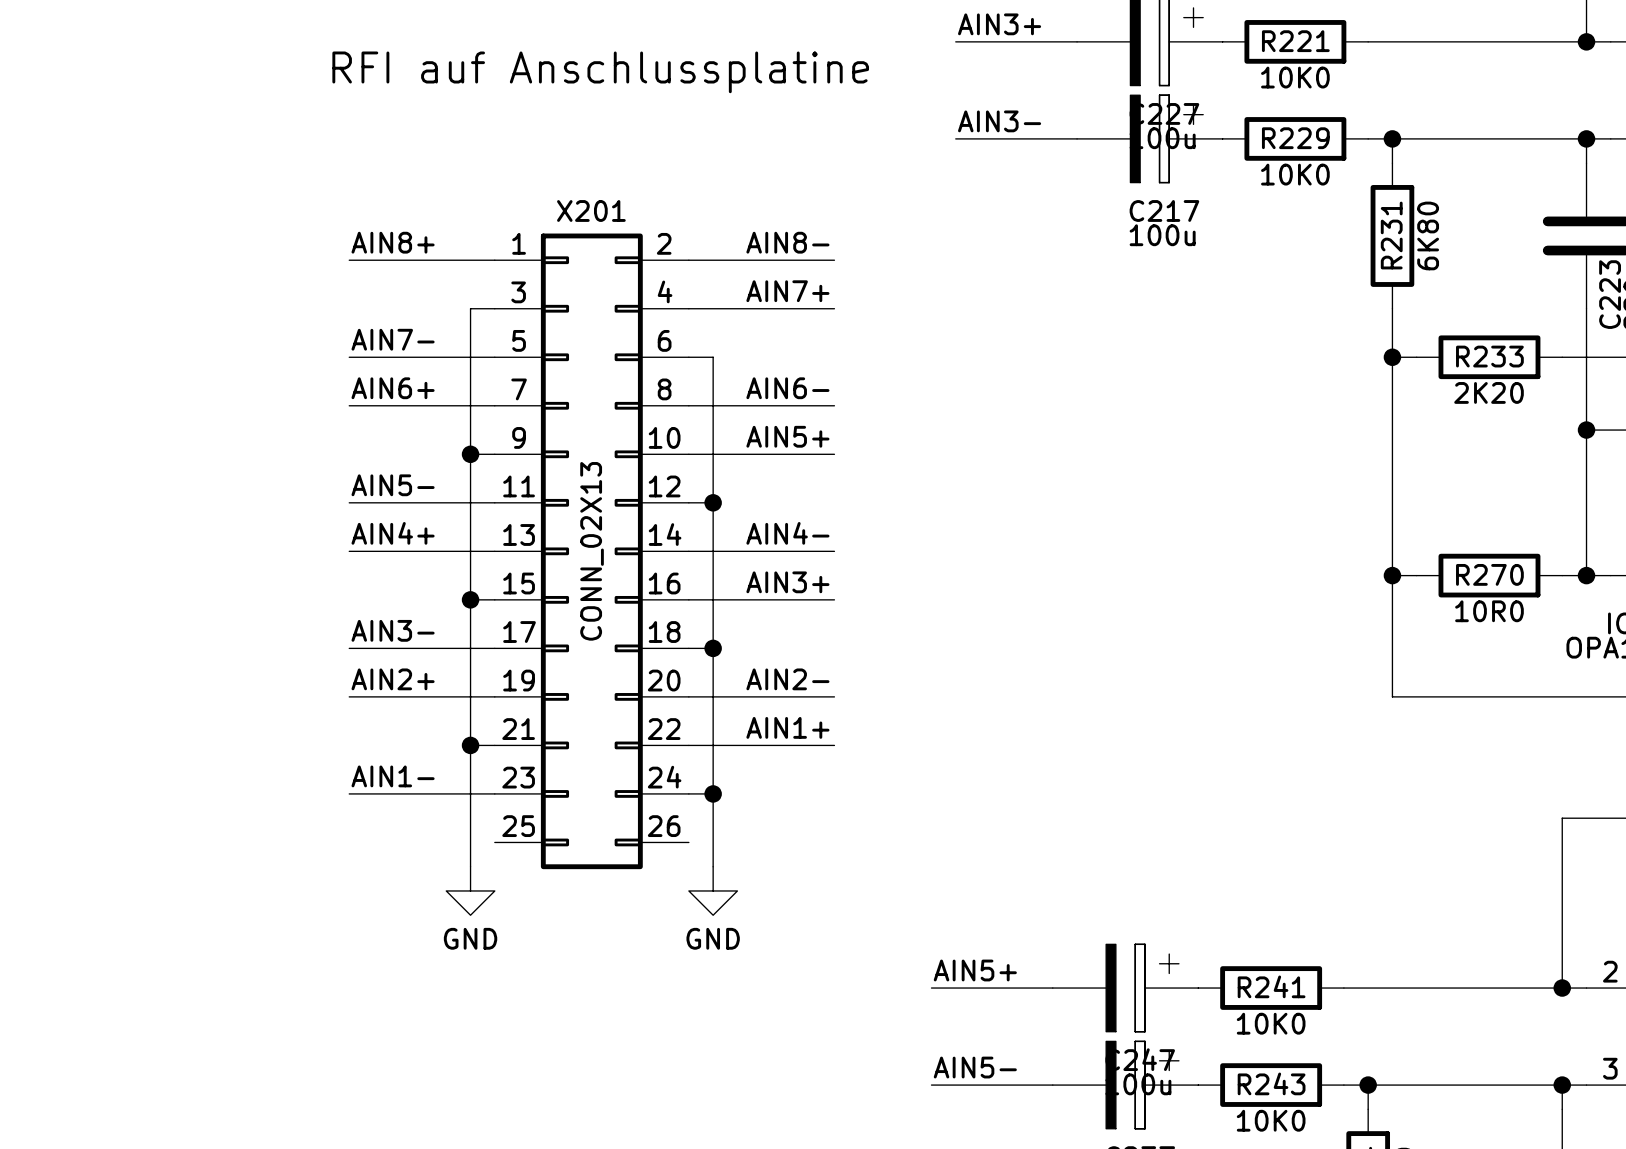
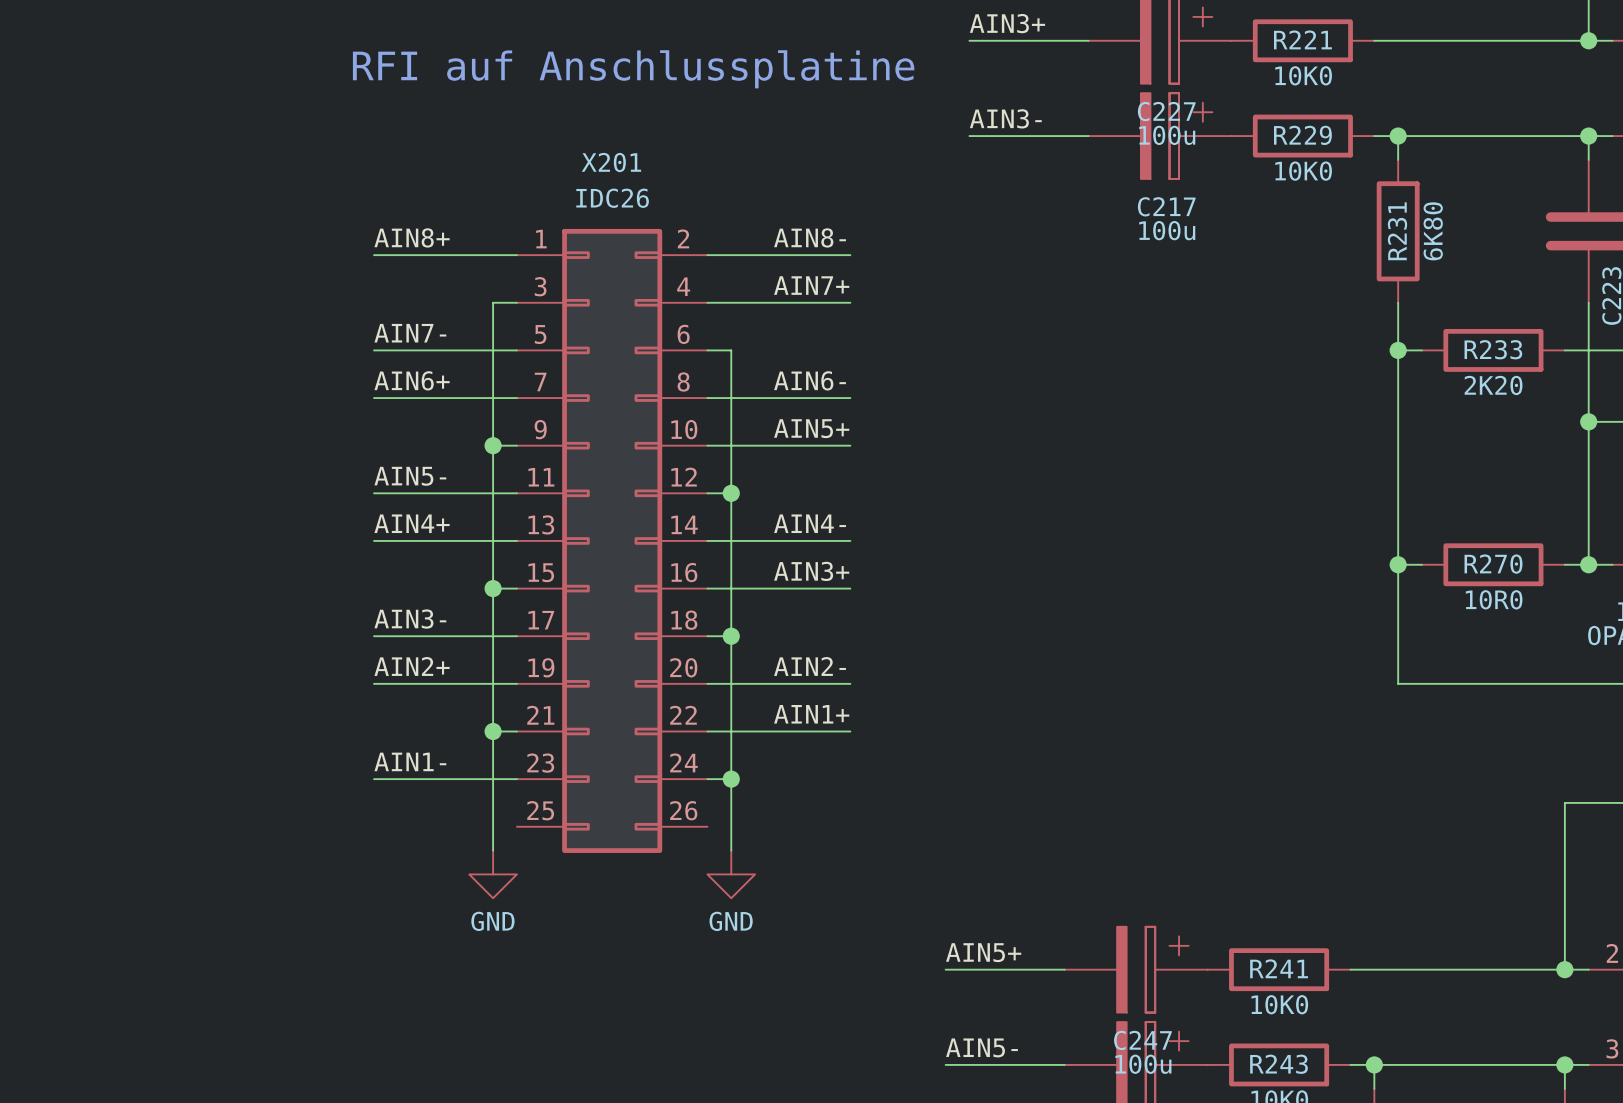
X201 text: none -> IDC26 (612, 198)
X201 name position: X201 (591, 210) -> X201 (611, 162)
X201 value: CONN_02X13 (592, 551) -> none

